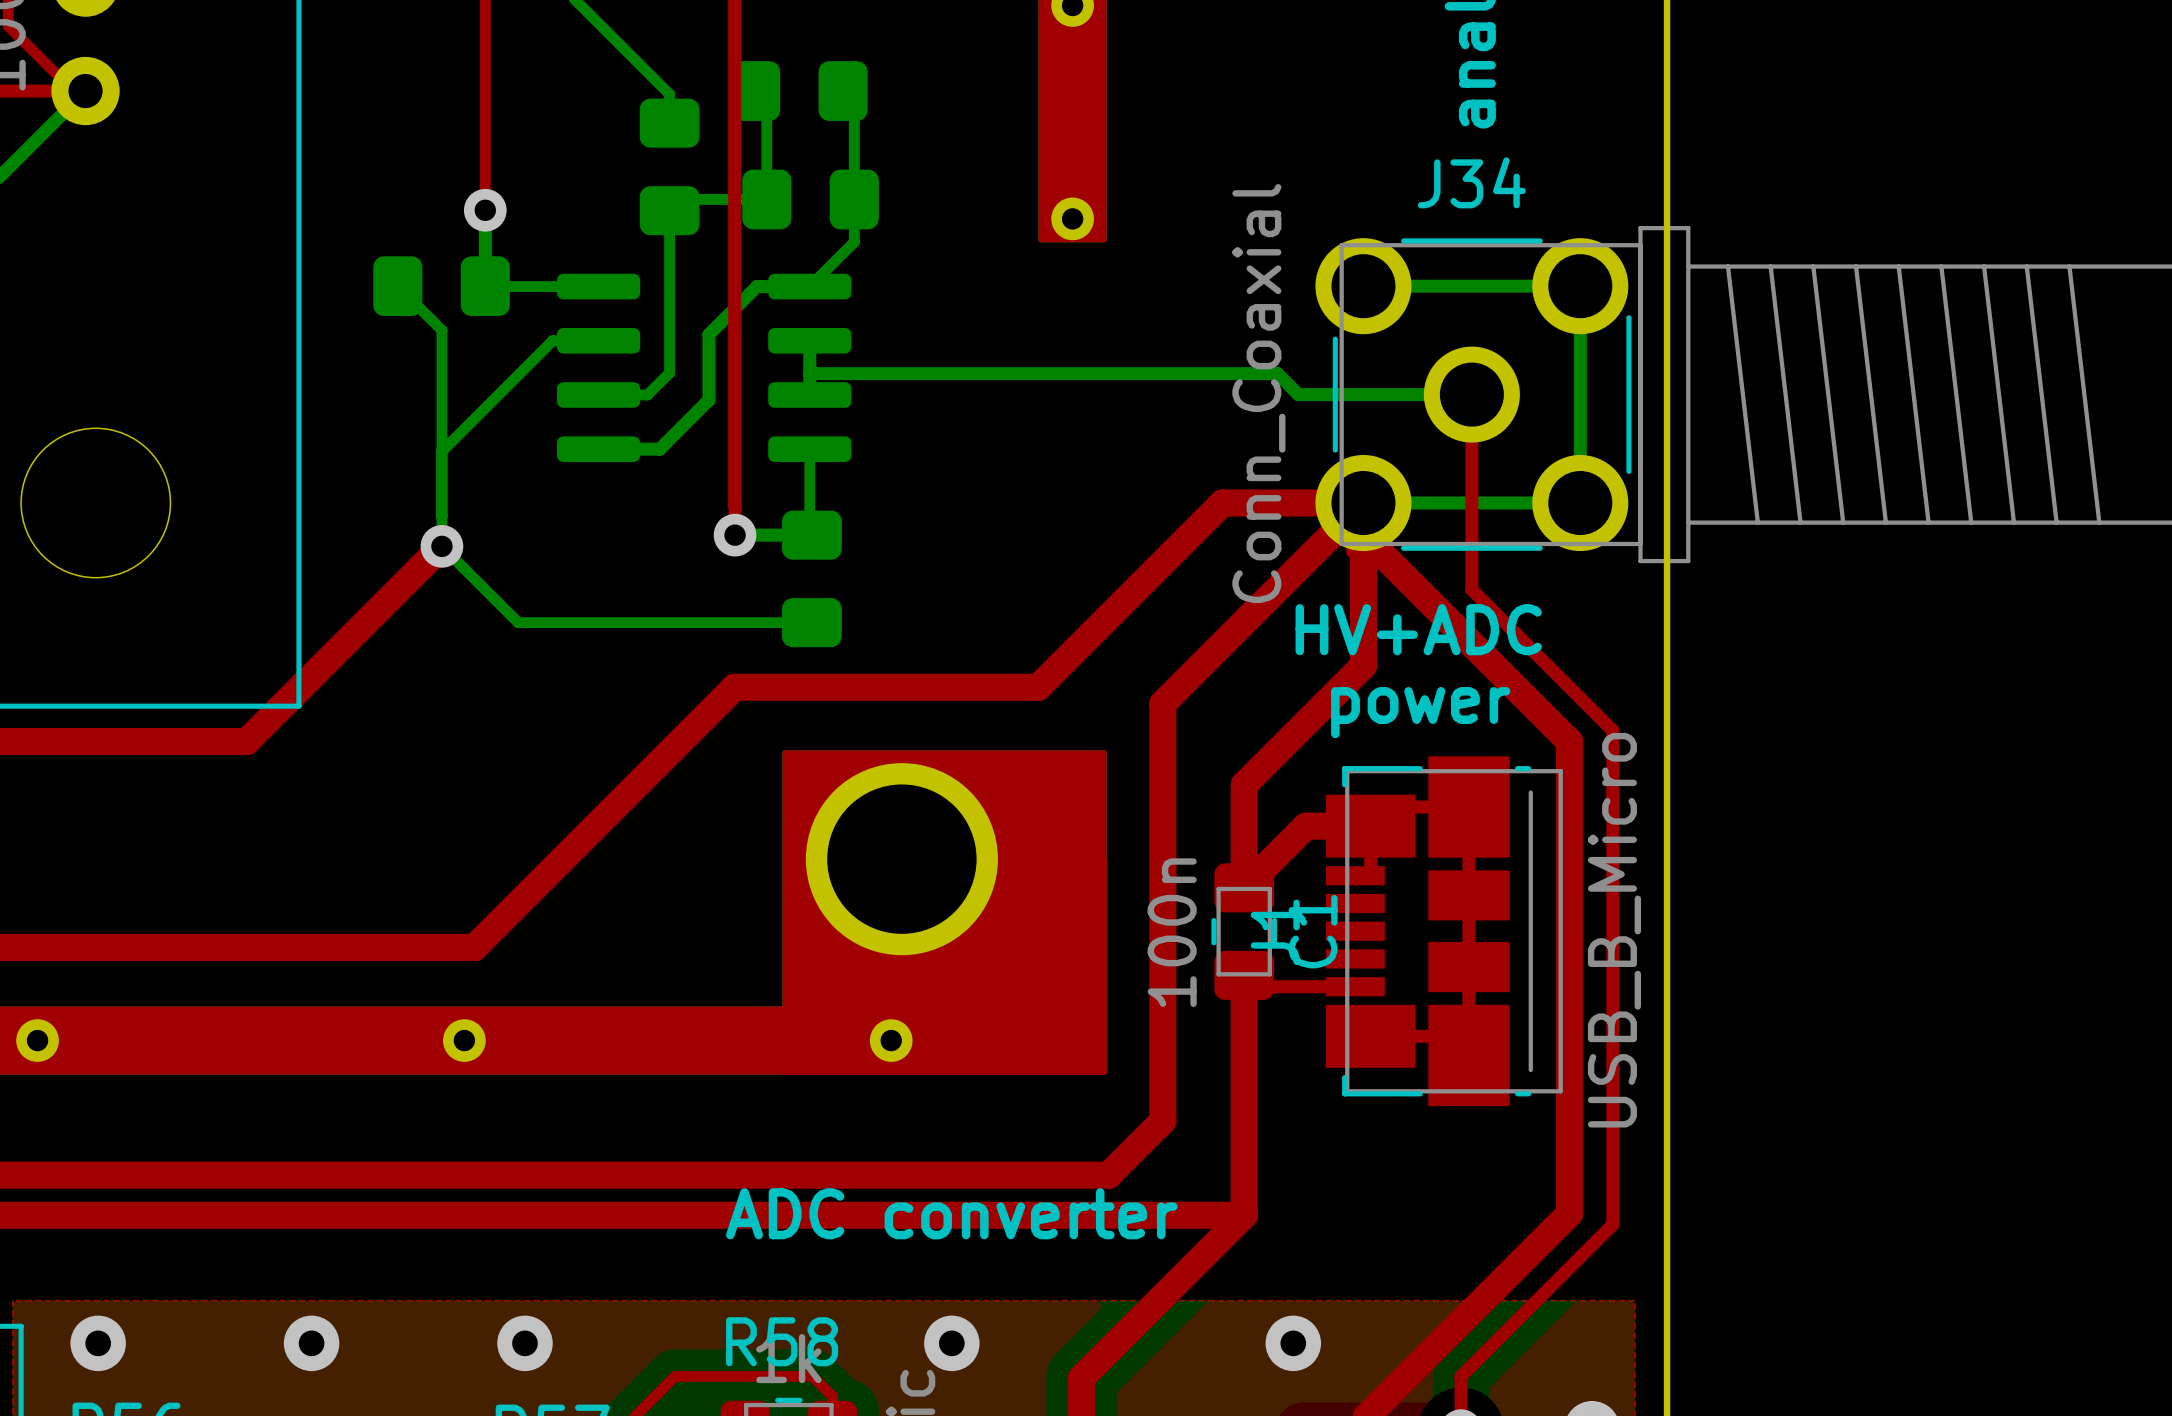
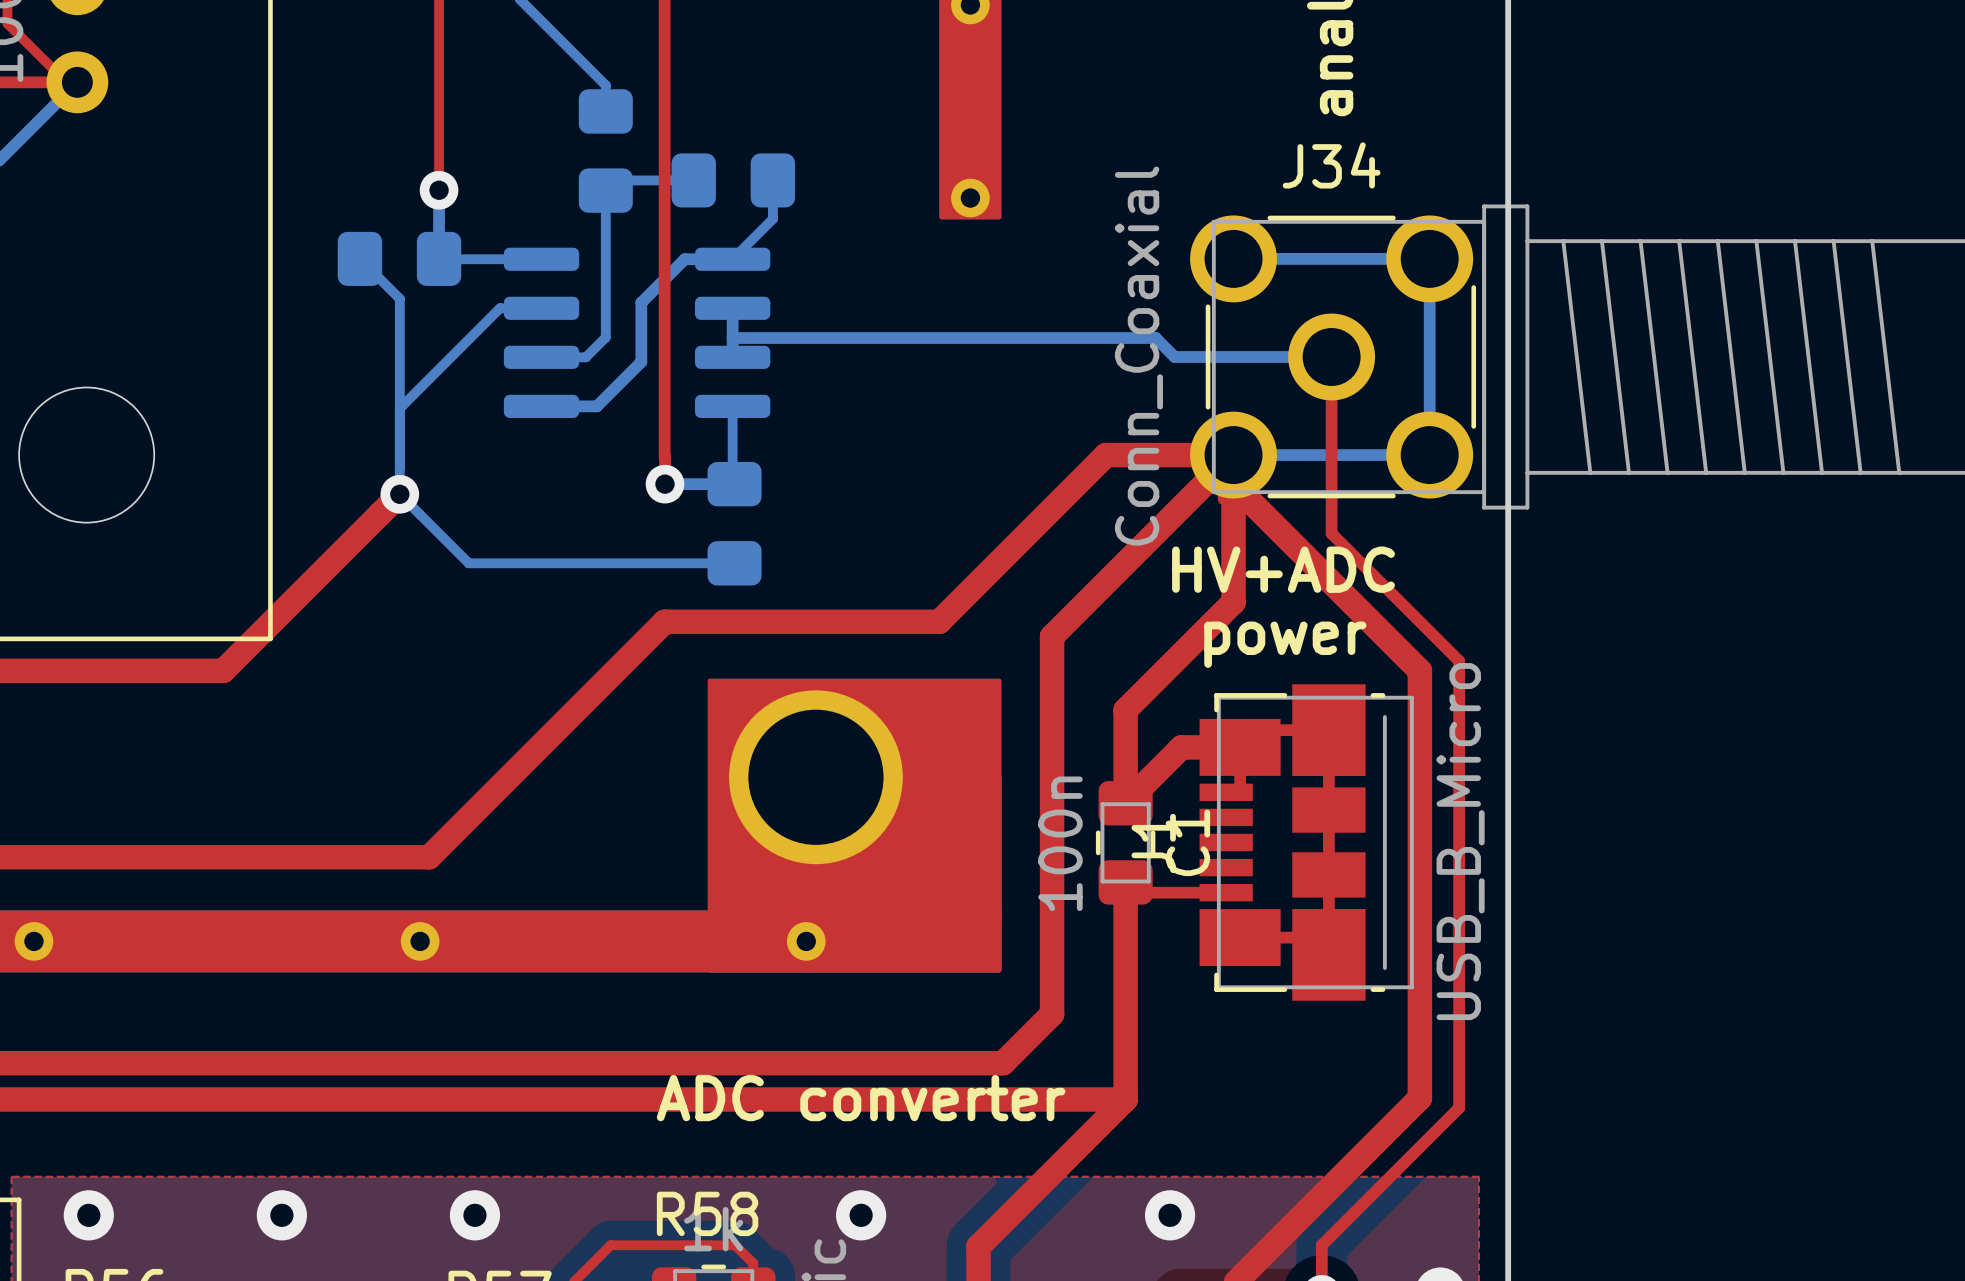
bottom track: (755, 91) (766, 102) (766, 199) -> none
part: (799, 91) -> none
bottom track: (843, 91) (854, 102) (854, 199) -> none

